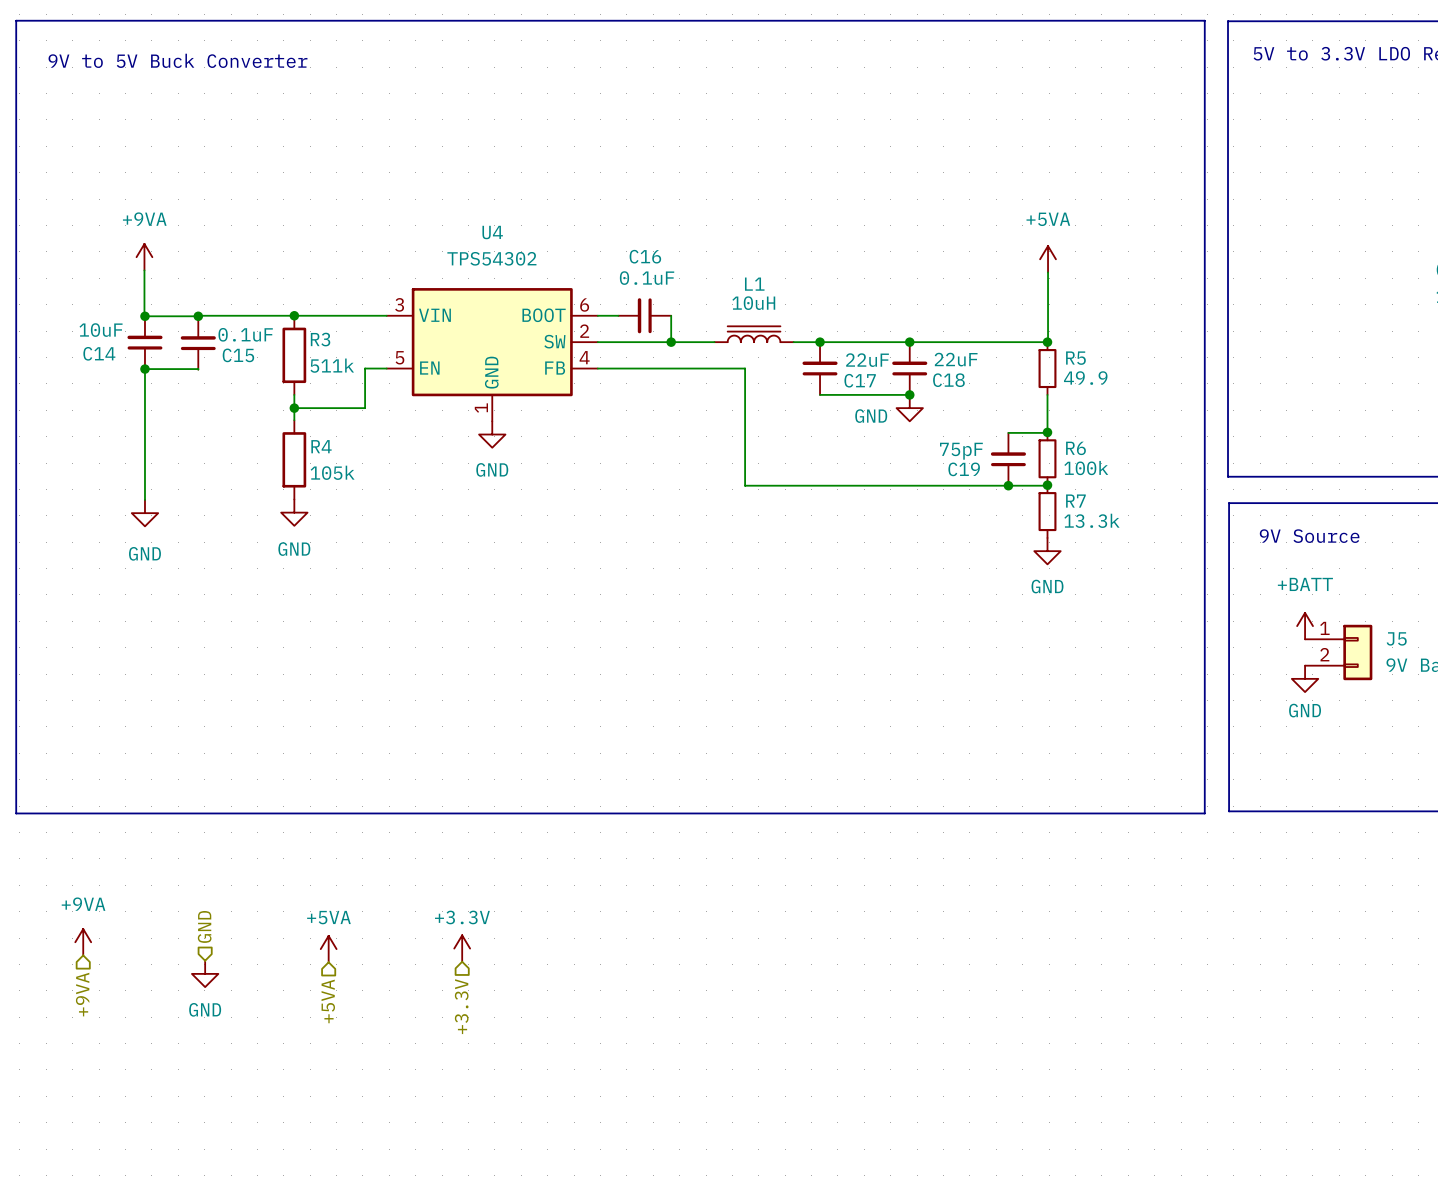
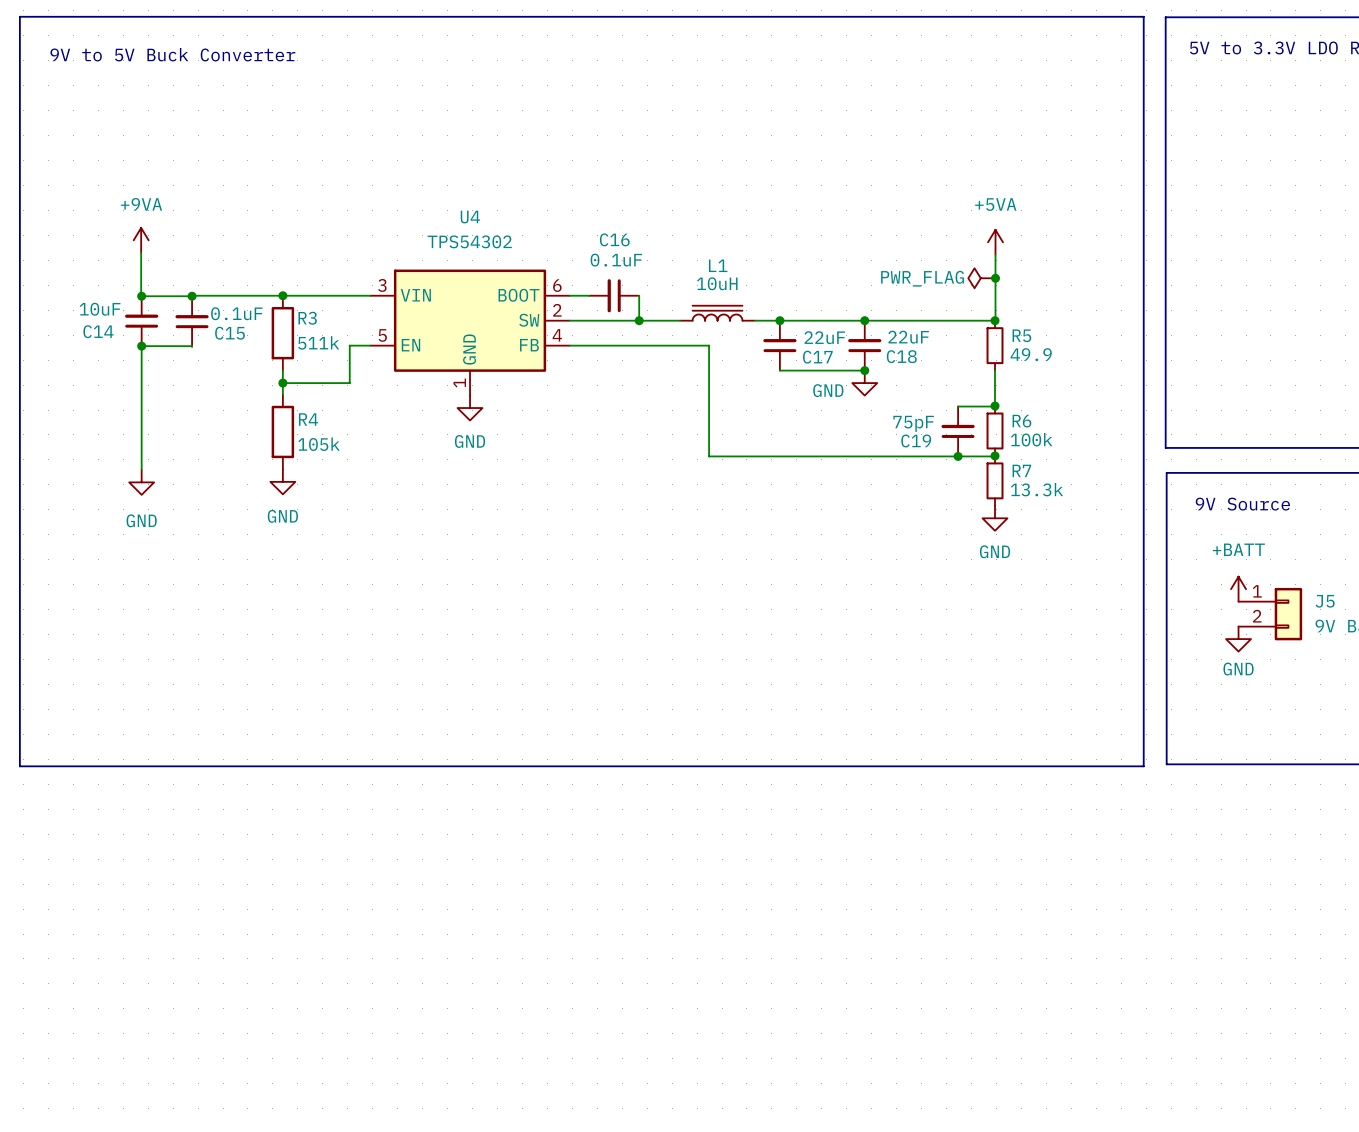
power symbol: none -> PWR_FLAG (980, 278)
junction: none -> (995, 278)
hierarchical label: GND (204, 926) -> none
power symbol: +9VA (83, 942) -> none
power symbol: +3.3V (462, 948) -> none
power symbol: +5VA (328, 949) -> none
power symbol: GND (205, 973) -> none
hierarchical label: +9VA (82, 994) -> none
hierarchical label: +5VA (328, 1001) -> none
hierarchical label: +3.3V (461, 1006) -> none

